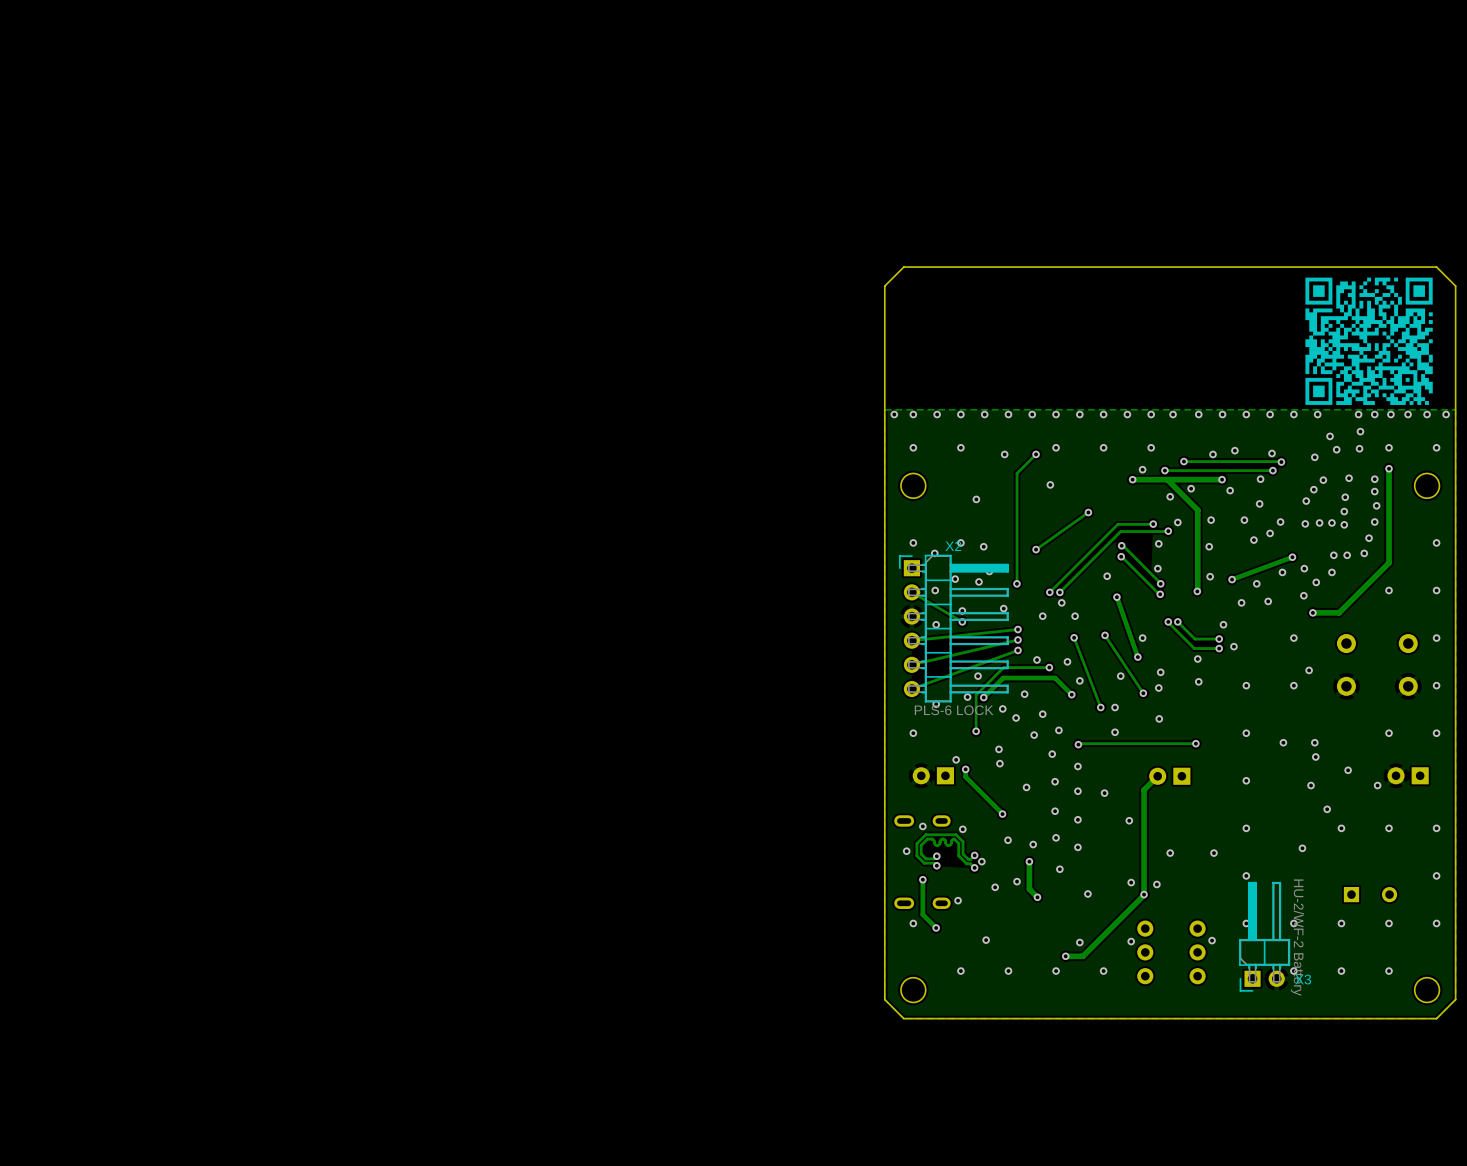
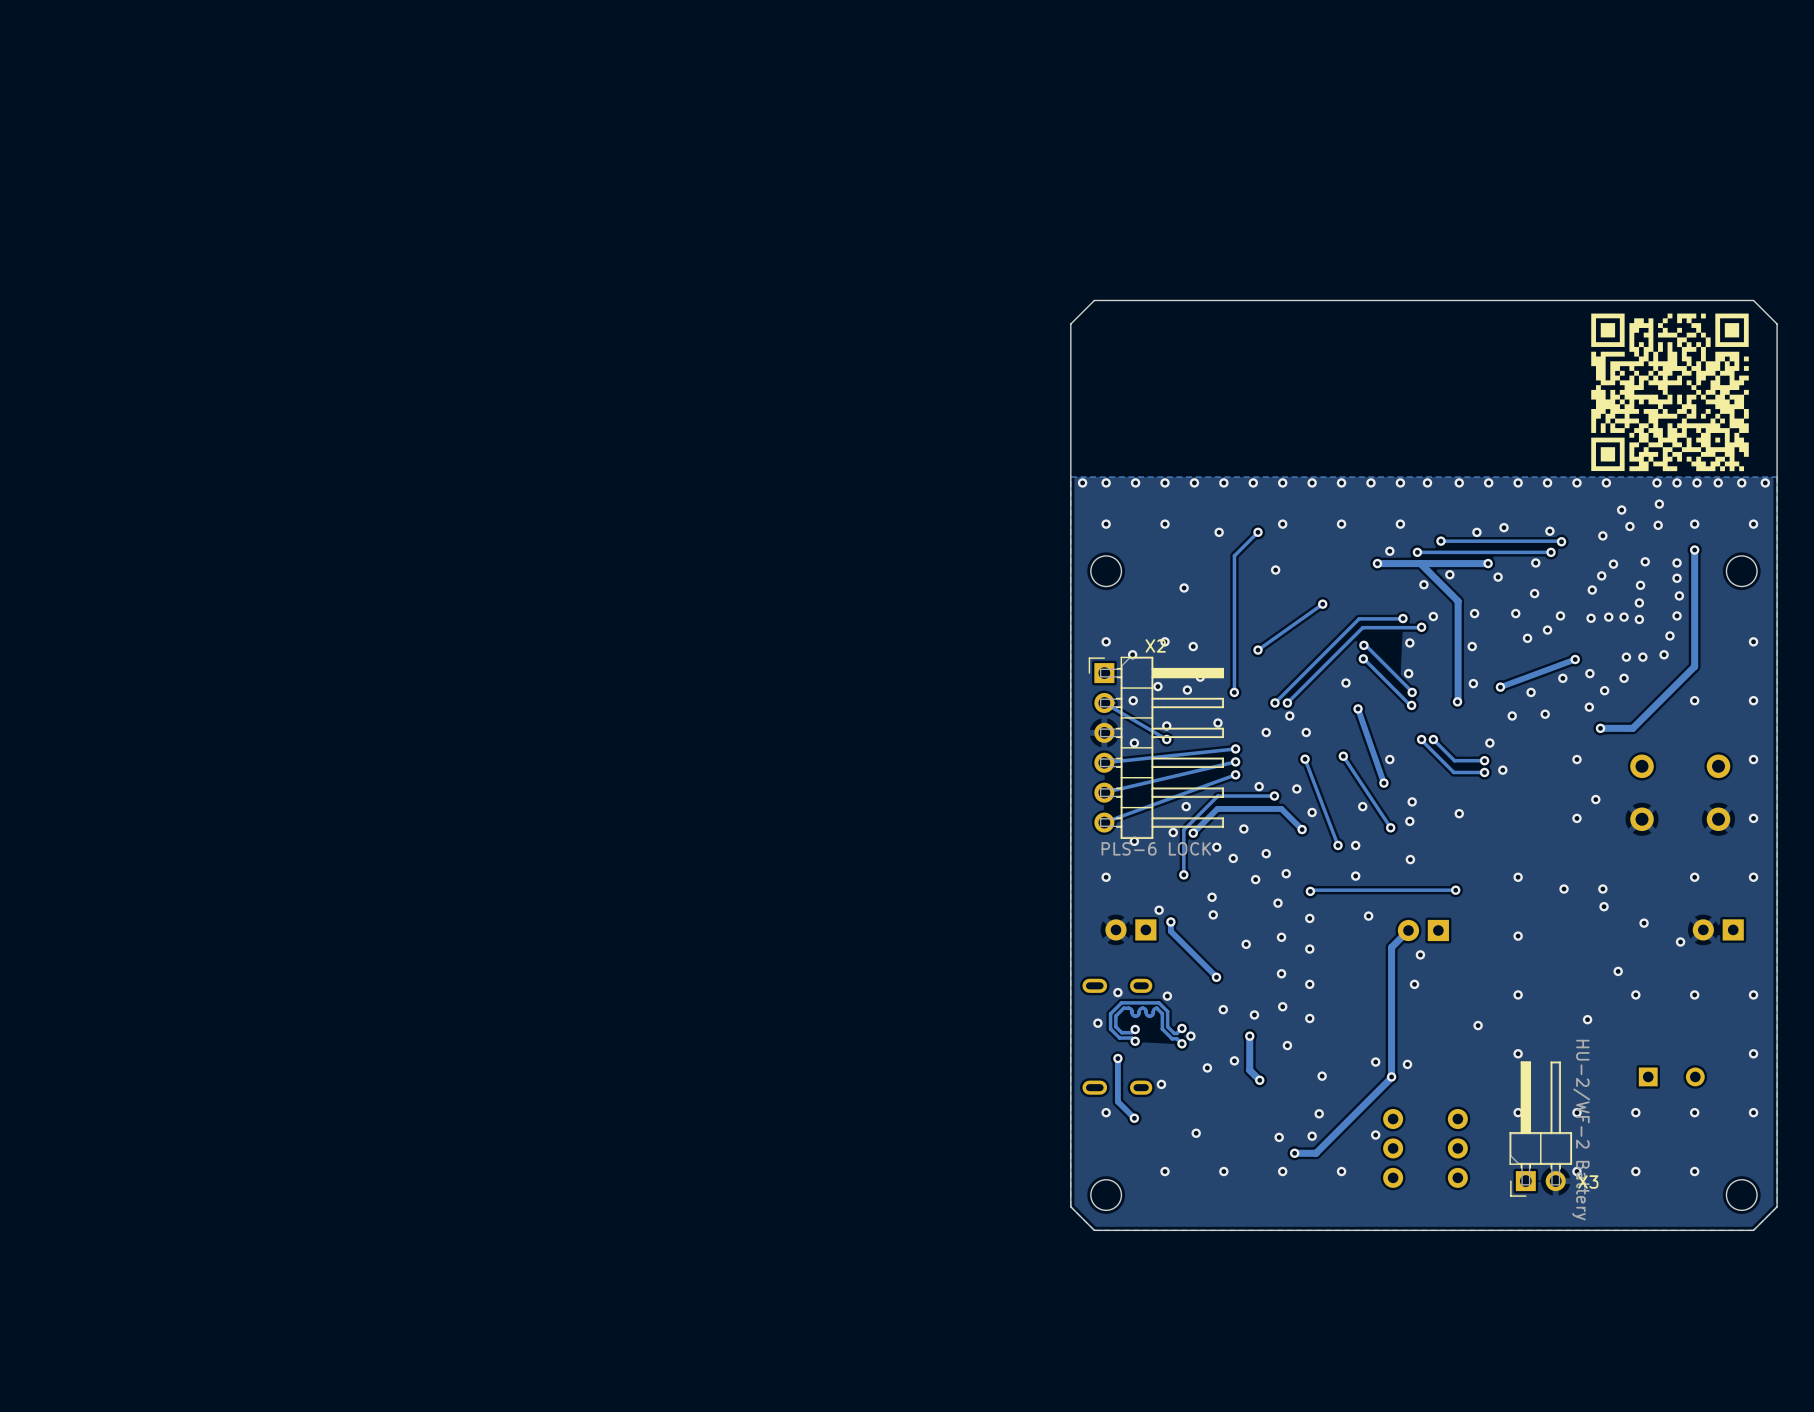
via: (1197, 659) -> none
via: (1246, 685) -> none
via: none -> (1368, 916)
via: (1311, 785) -> none
via: (1104, 793) -> none
via: none -> (1420, 954)
via: none -> (1414, 984)
via: (1129, 820) -> none
via: (1170, 853) -> none
via: none -> (1319, 1113)
via: (1212, 940) -> none
via: none -> (1279, 1137)

